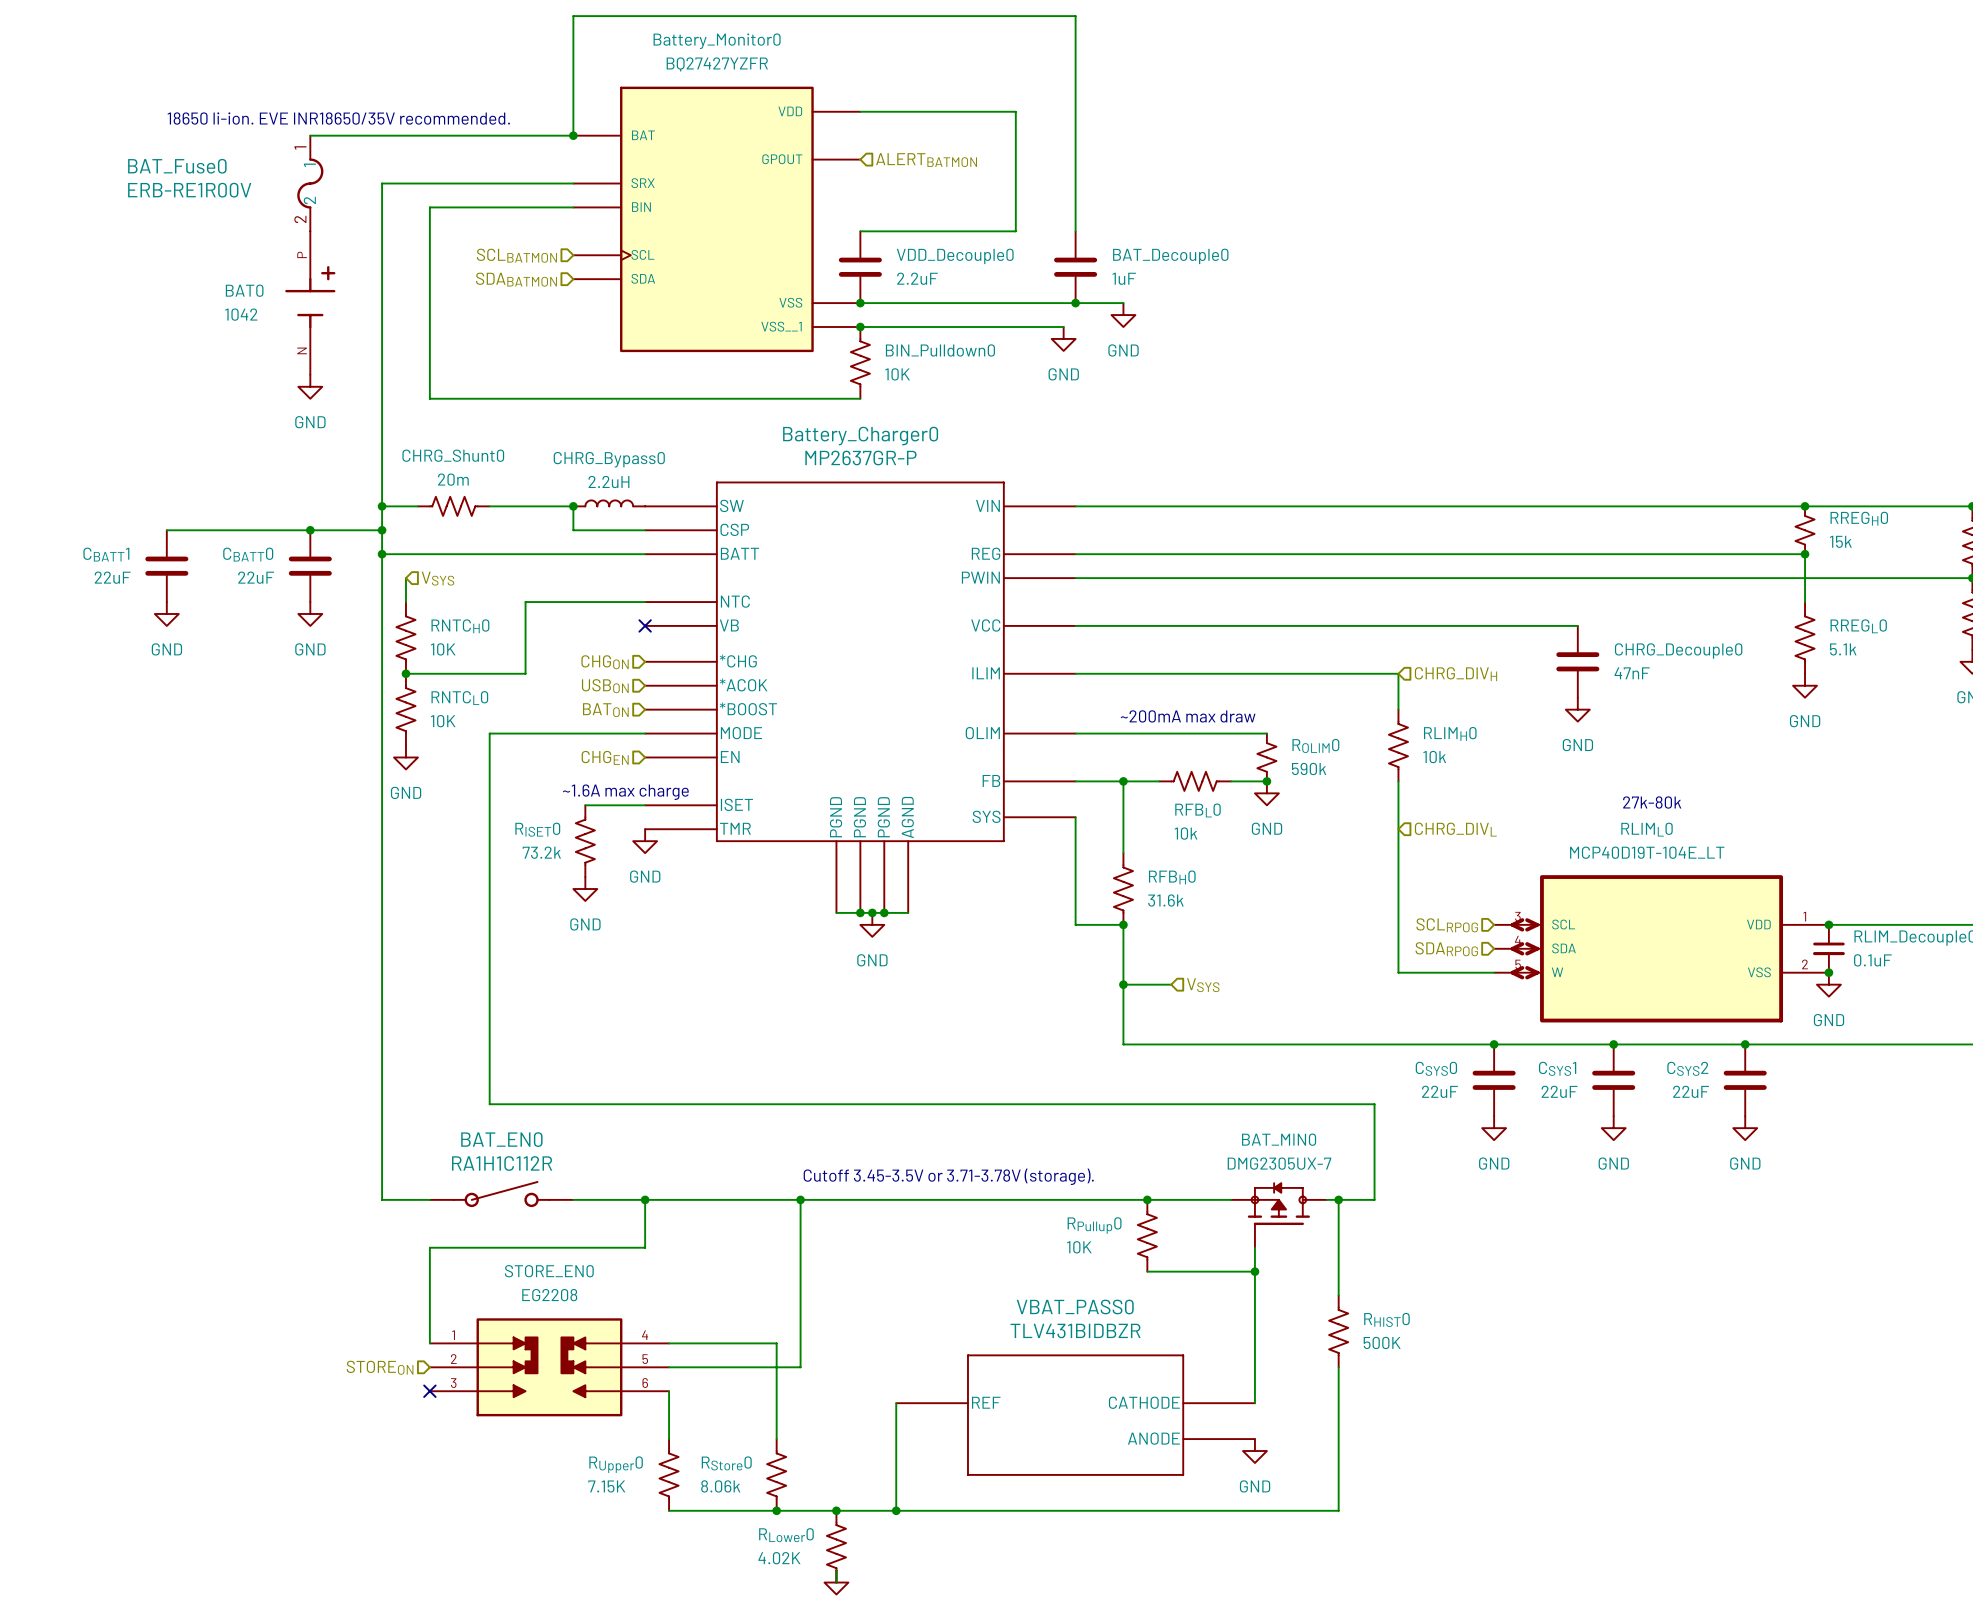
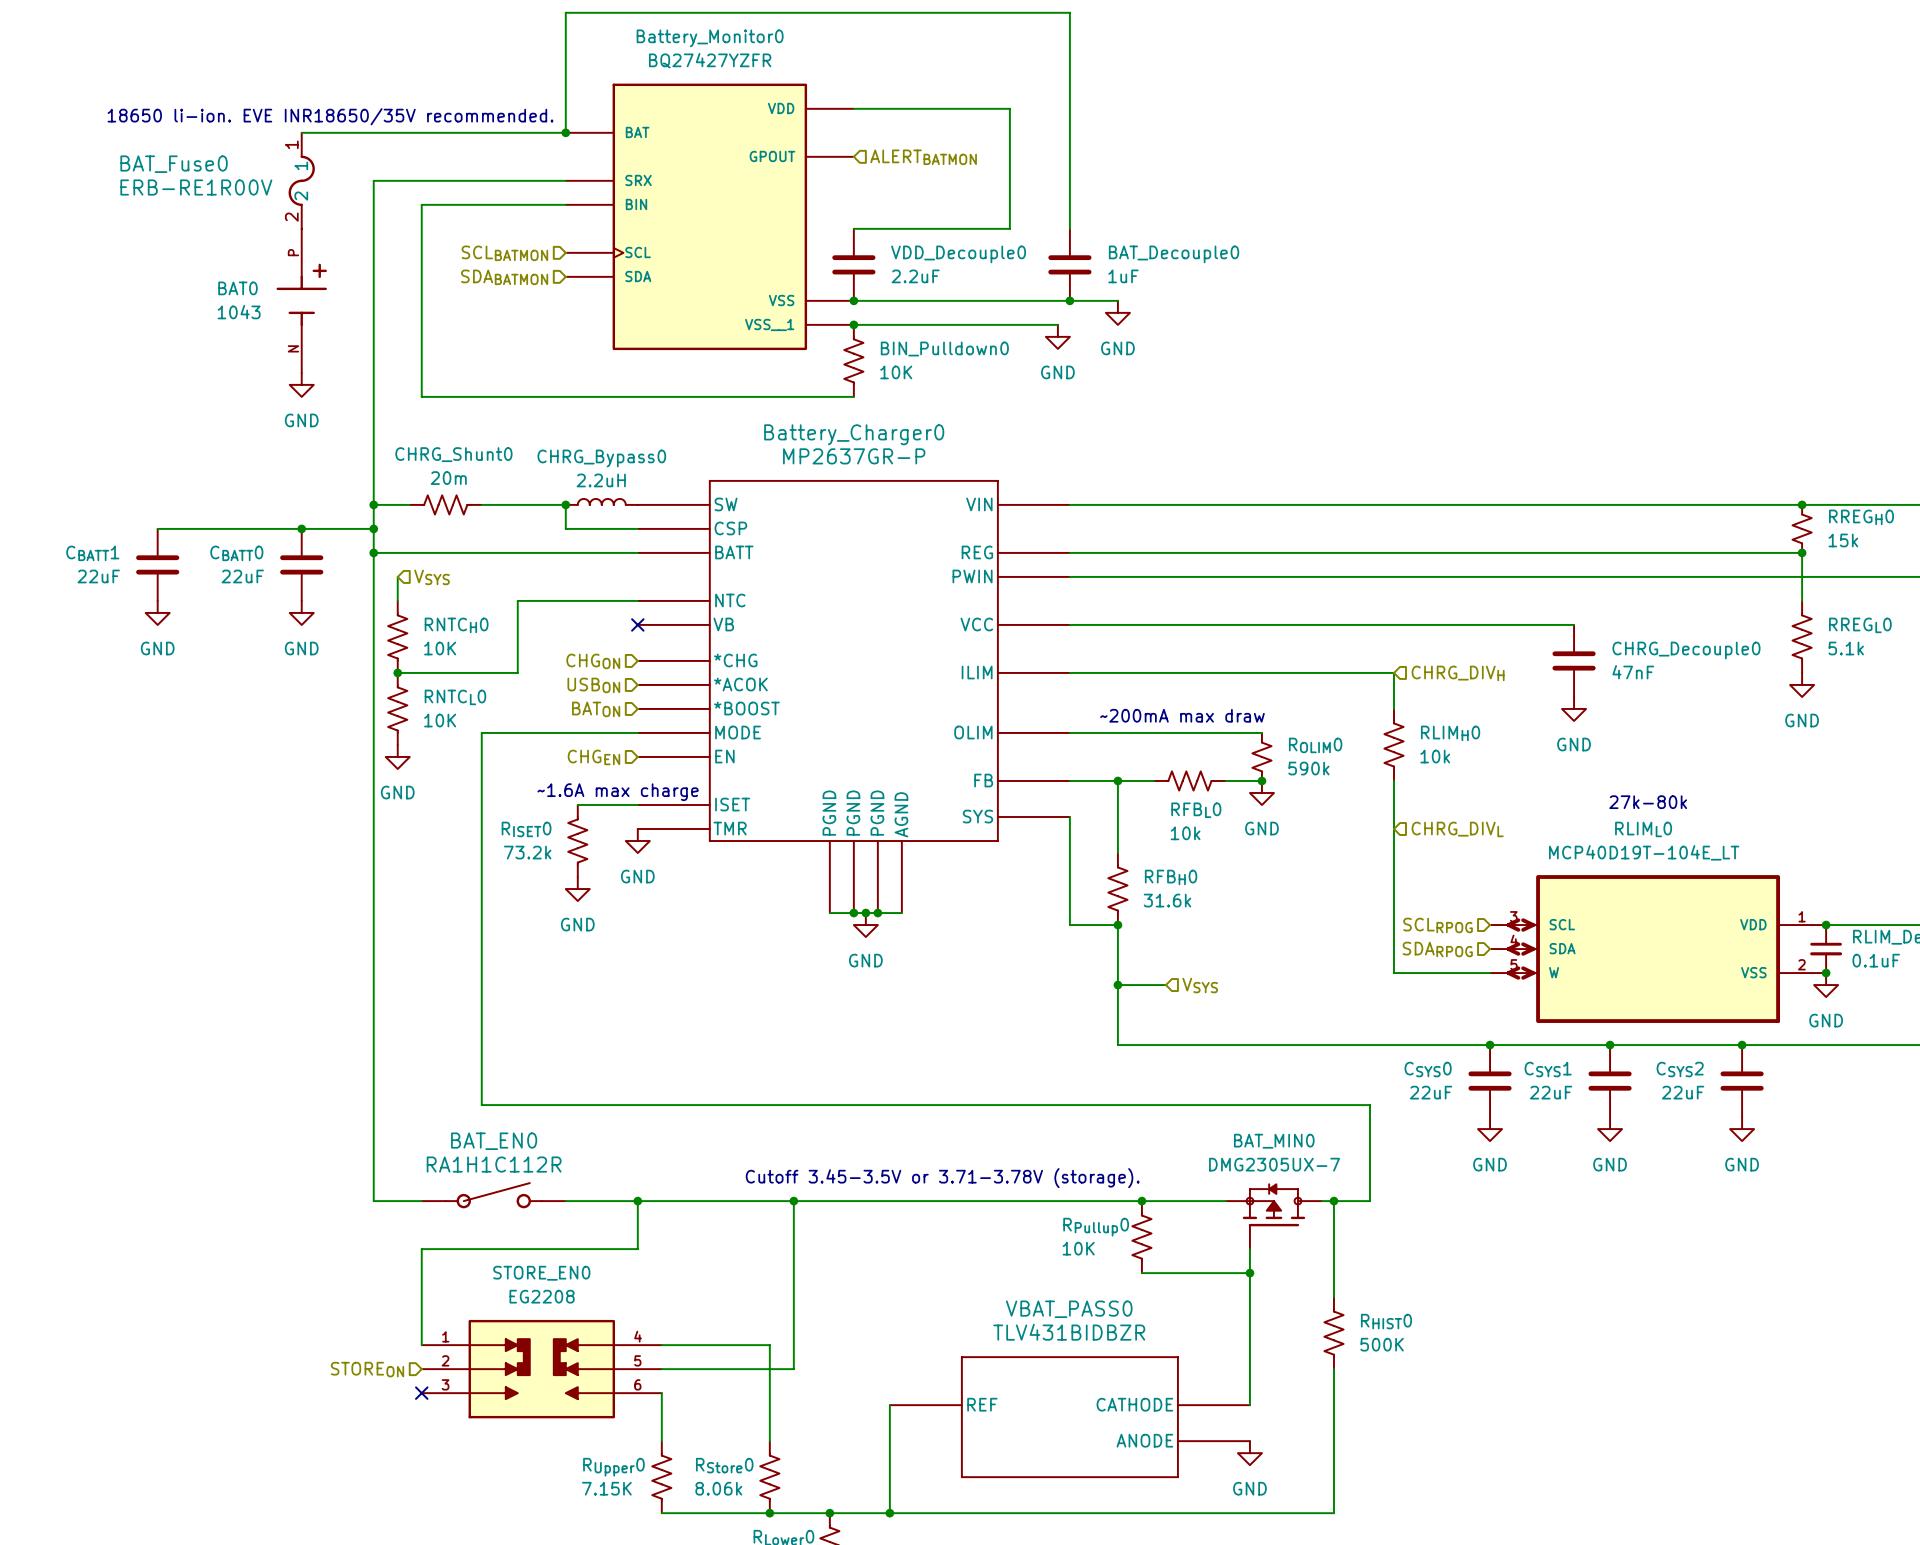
BAT0 value: 1042 (241, 314) -> 1043 (239, 312)

